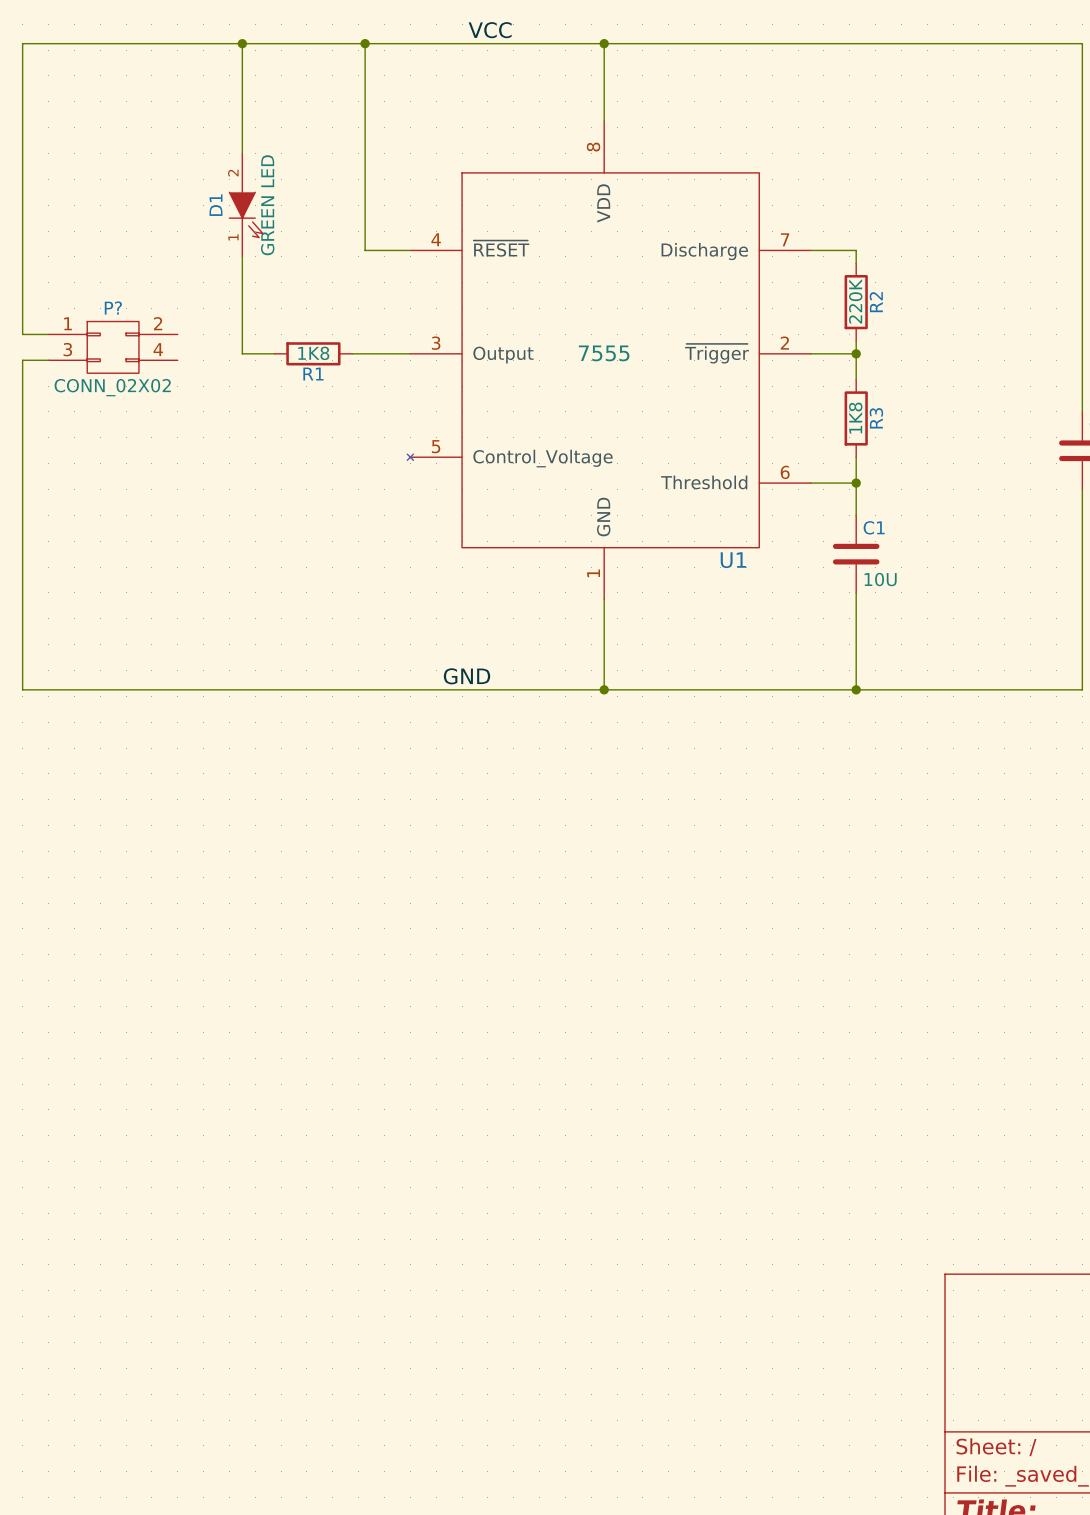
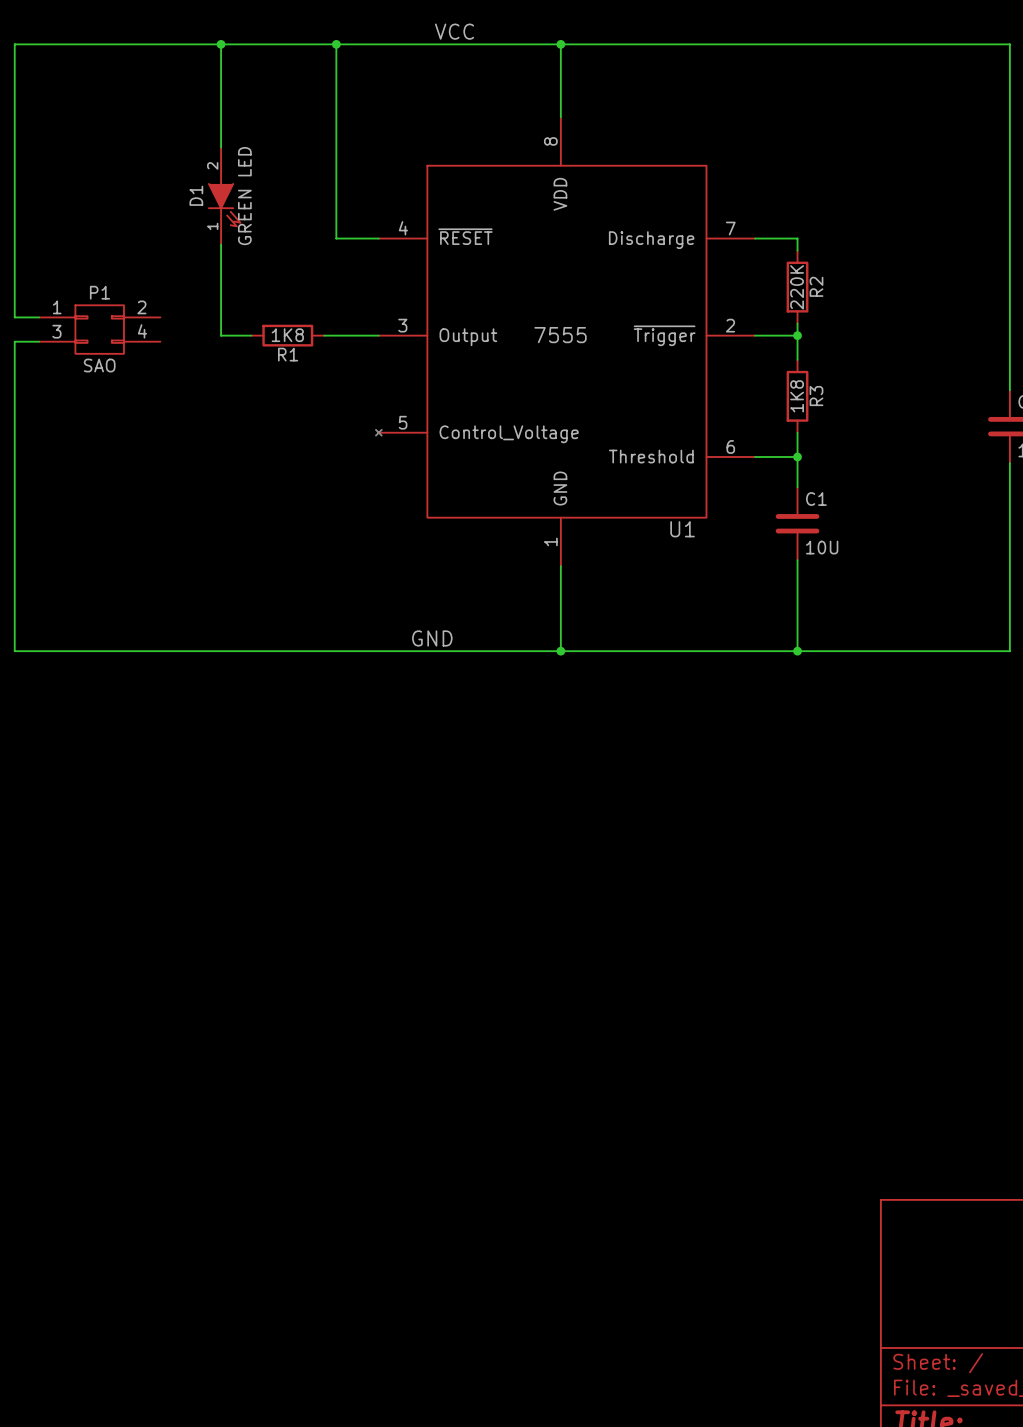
P? name: P? (113, 308) -> P1 (99, 292)
P? value: CONN_02X02 (112, 387) -> SAO (99, 365)

